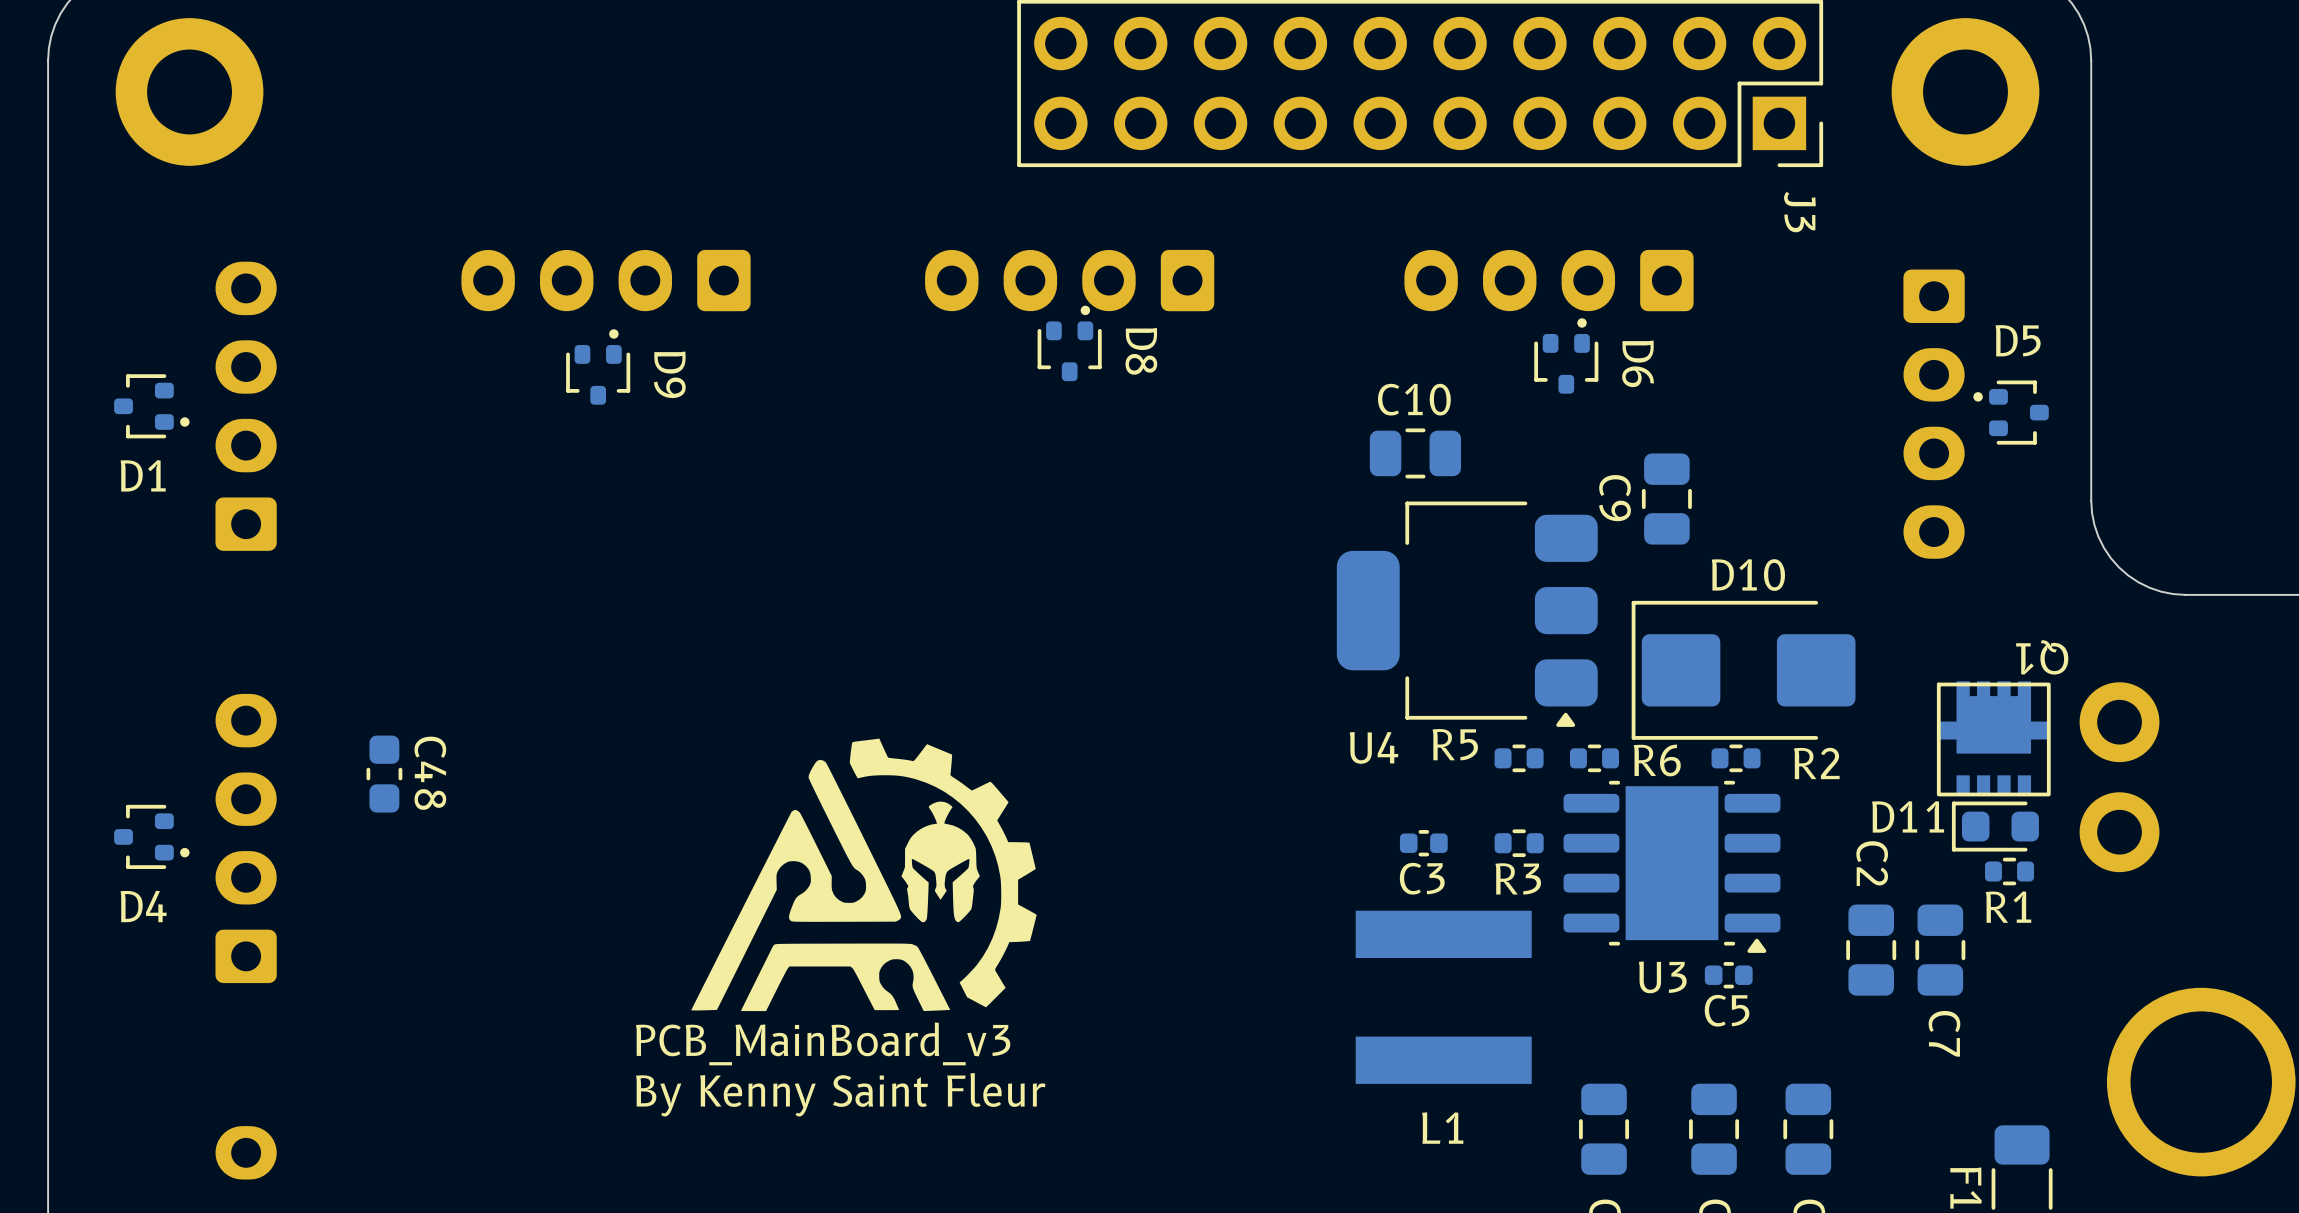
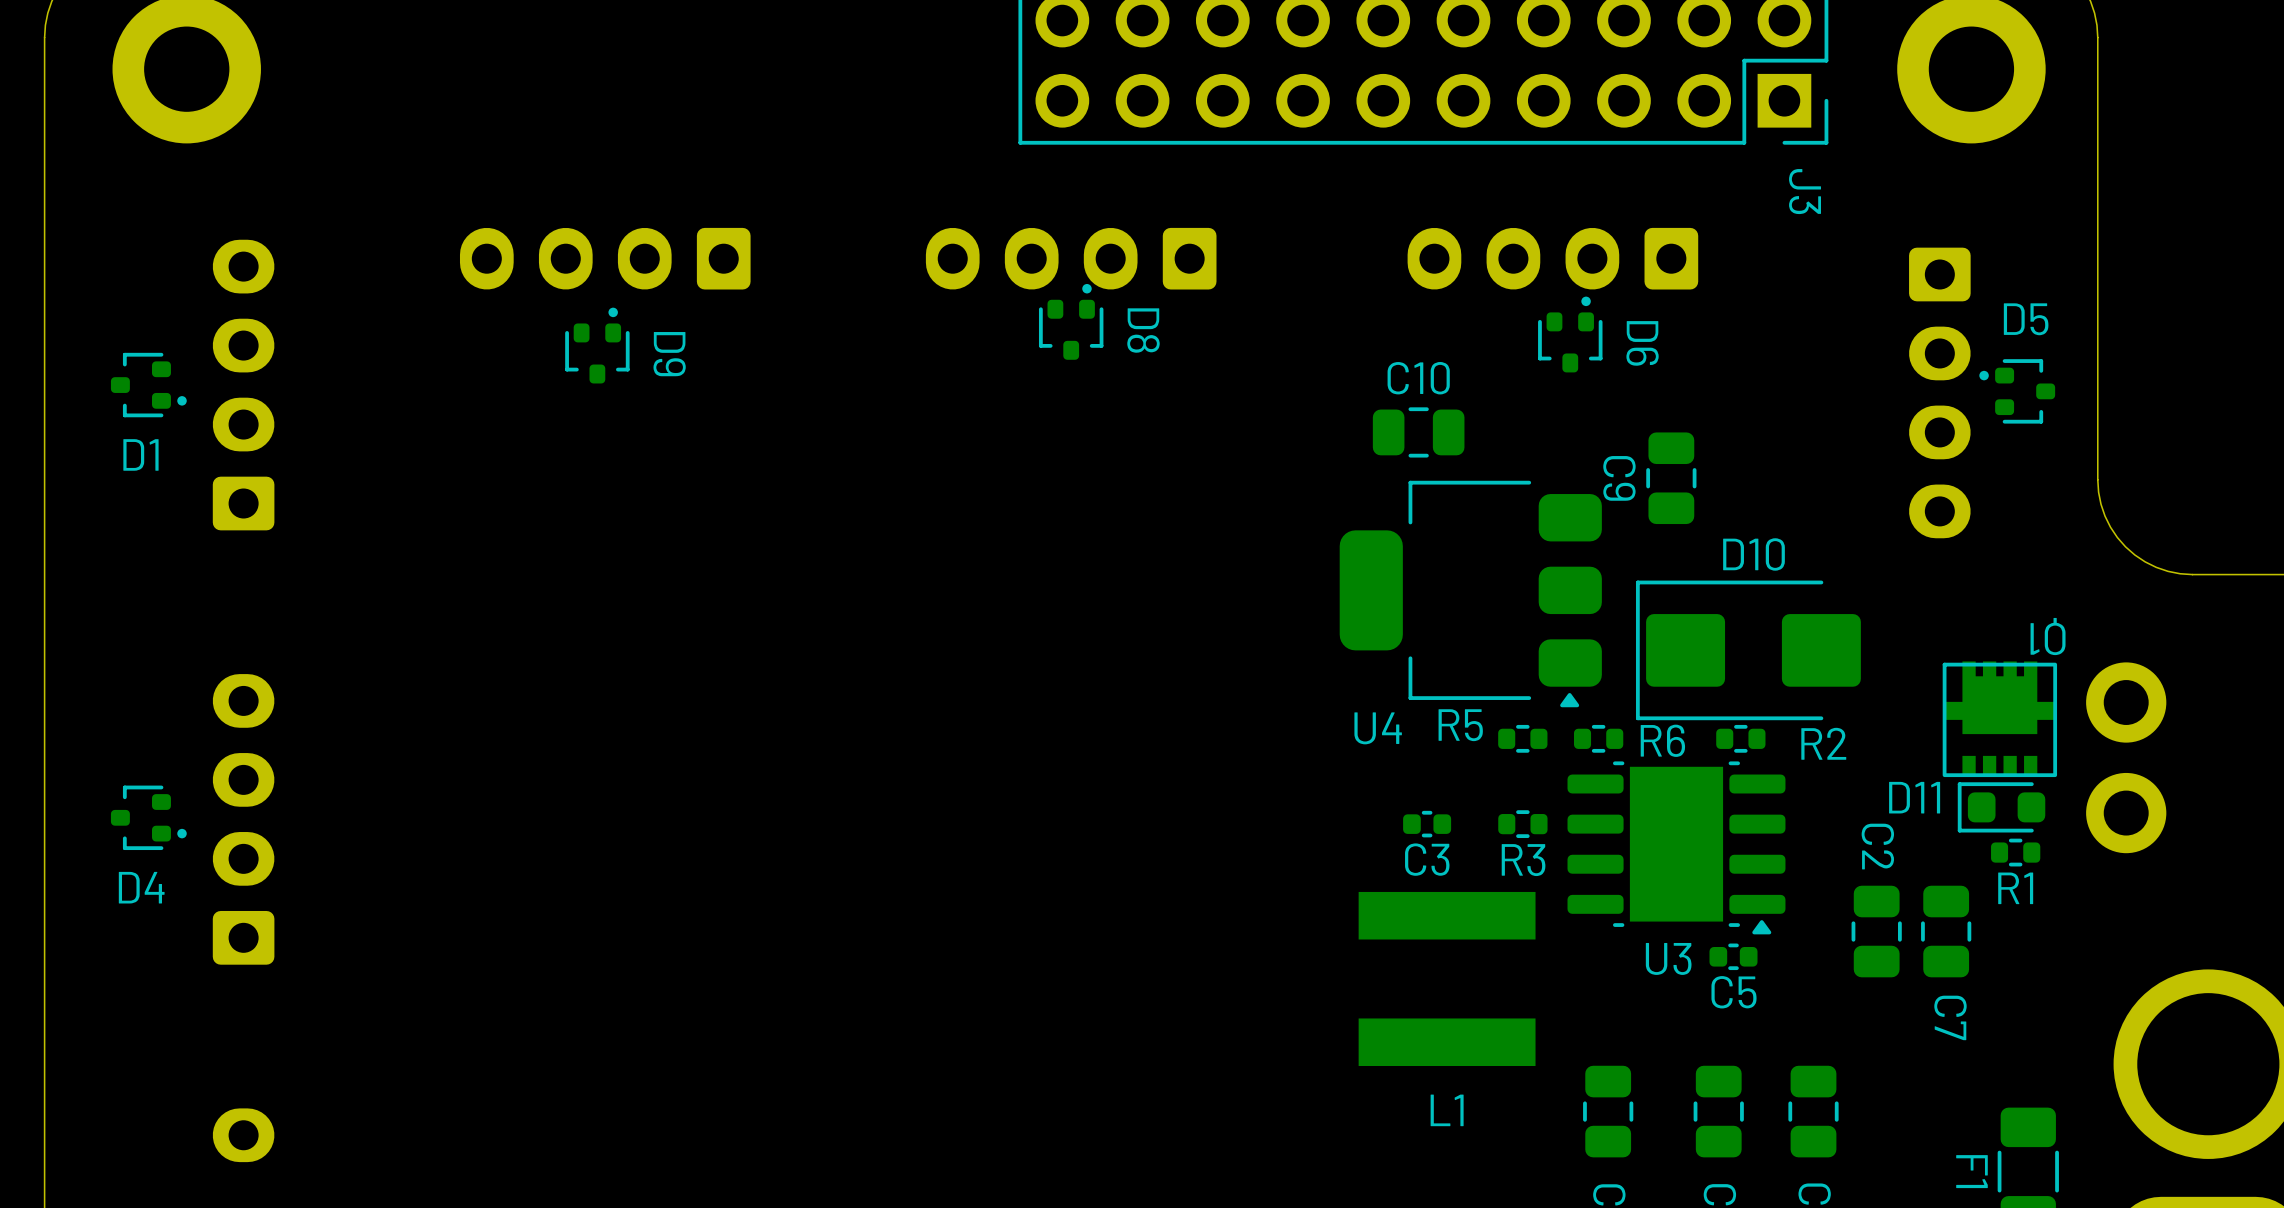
drawing: [691, 738, 1037, 1012] -> none
C48: (384, 774) -> none
text: PCB_MainBoard_v3 (823, 1043) -> none
text: By Kenny Saint Fleur (840, 1094) -> none

